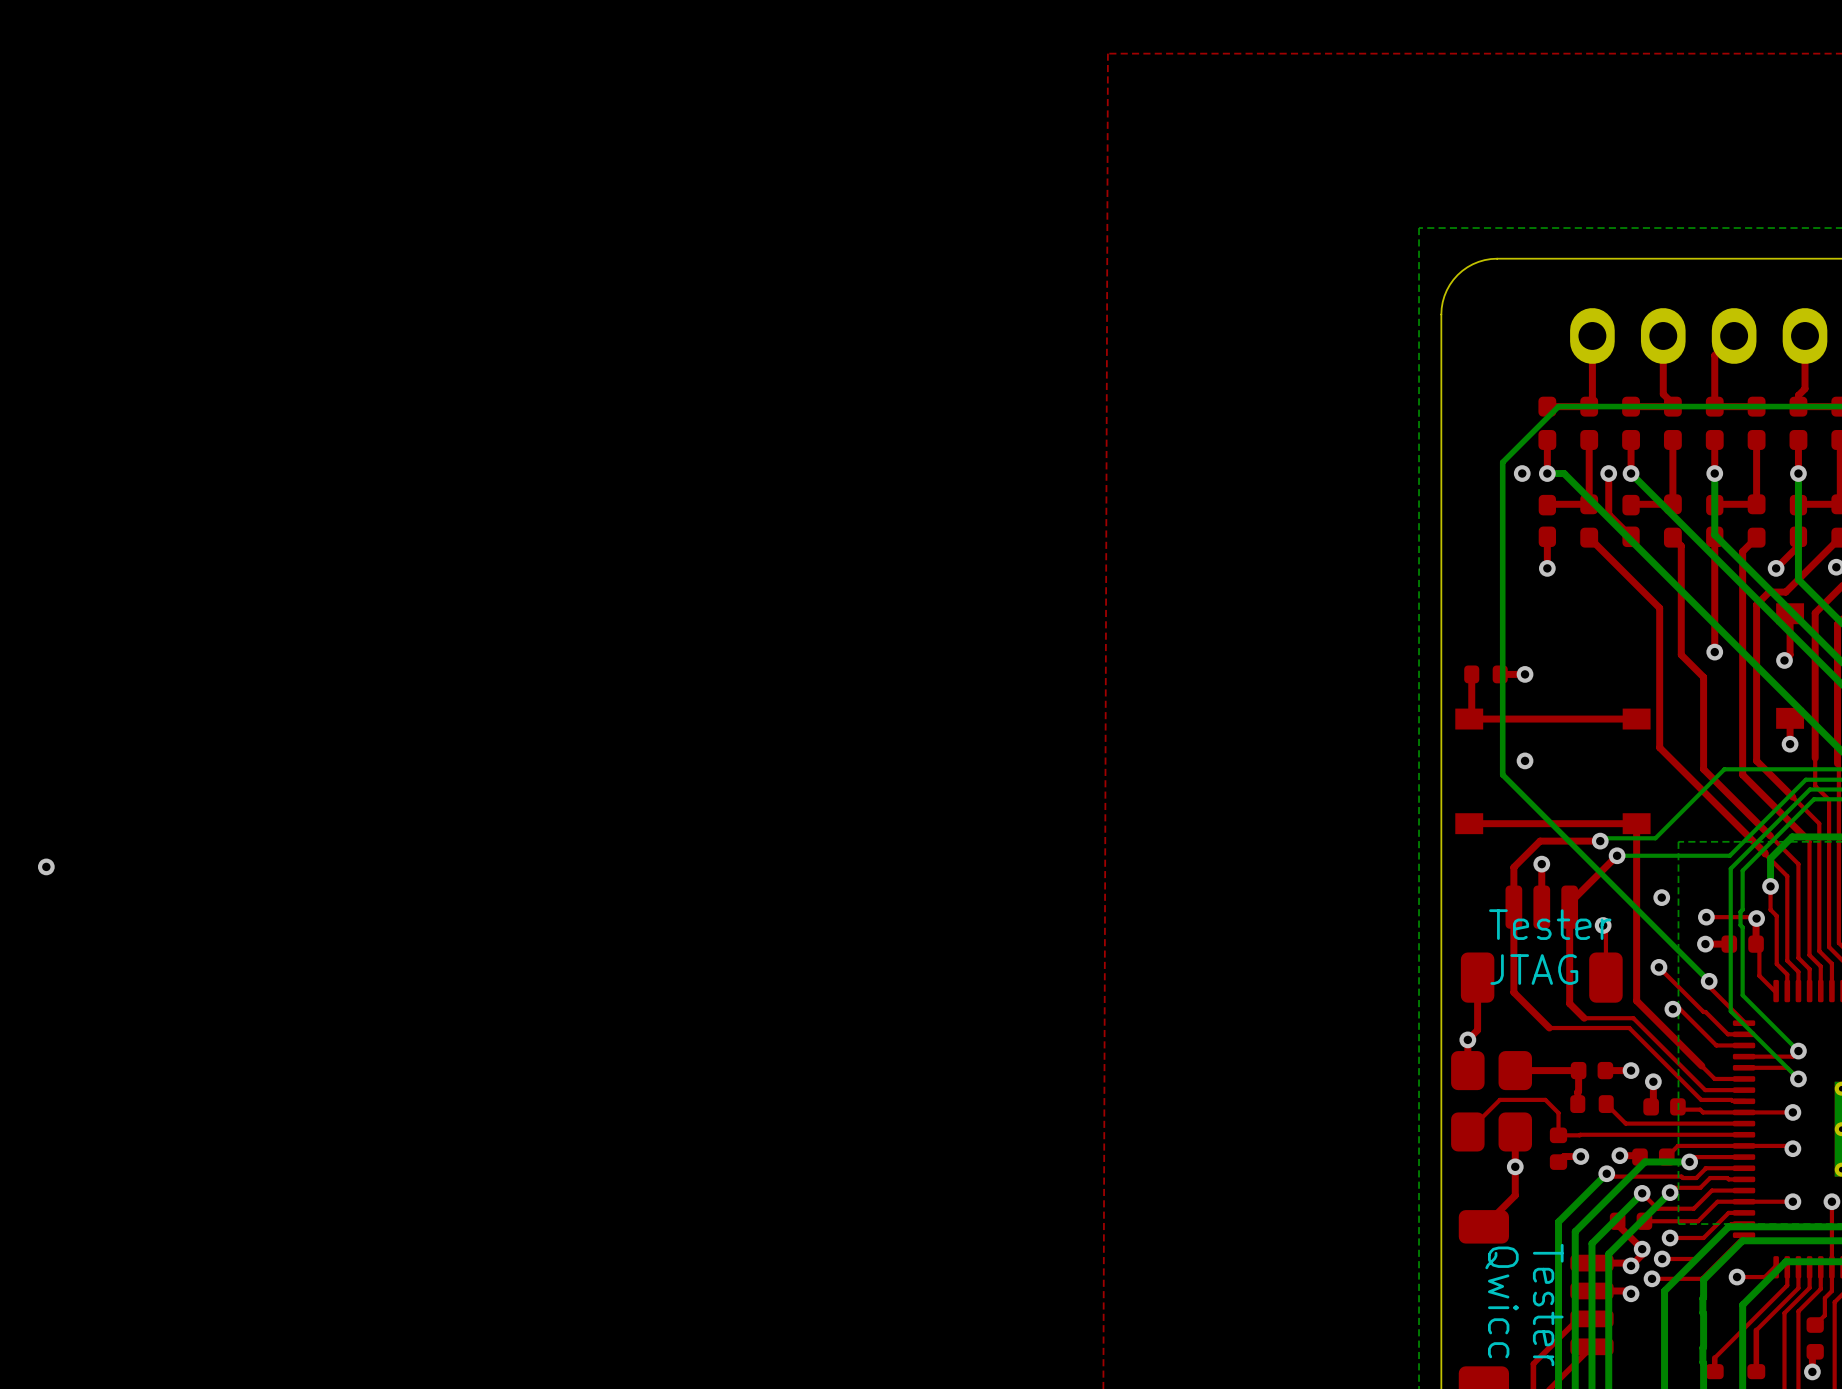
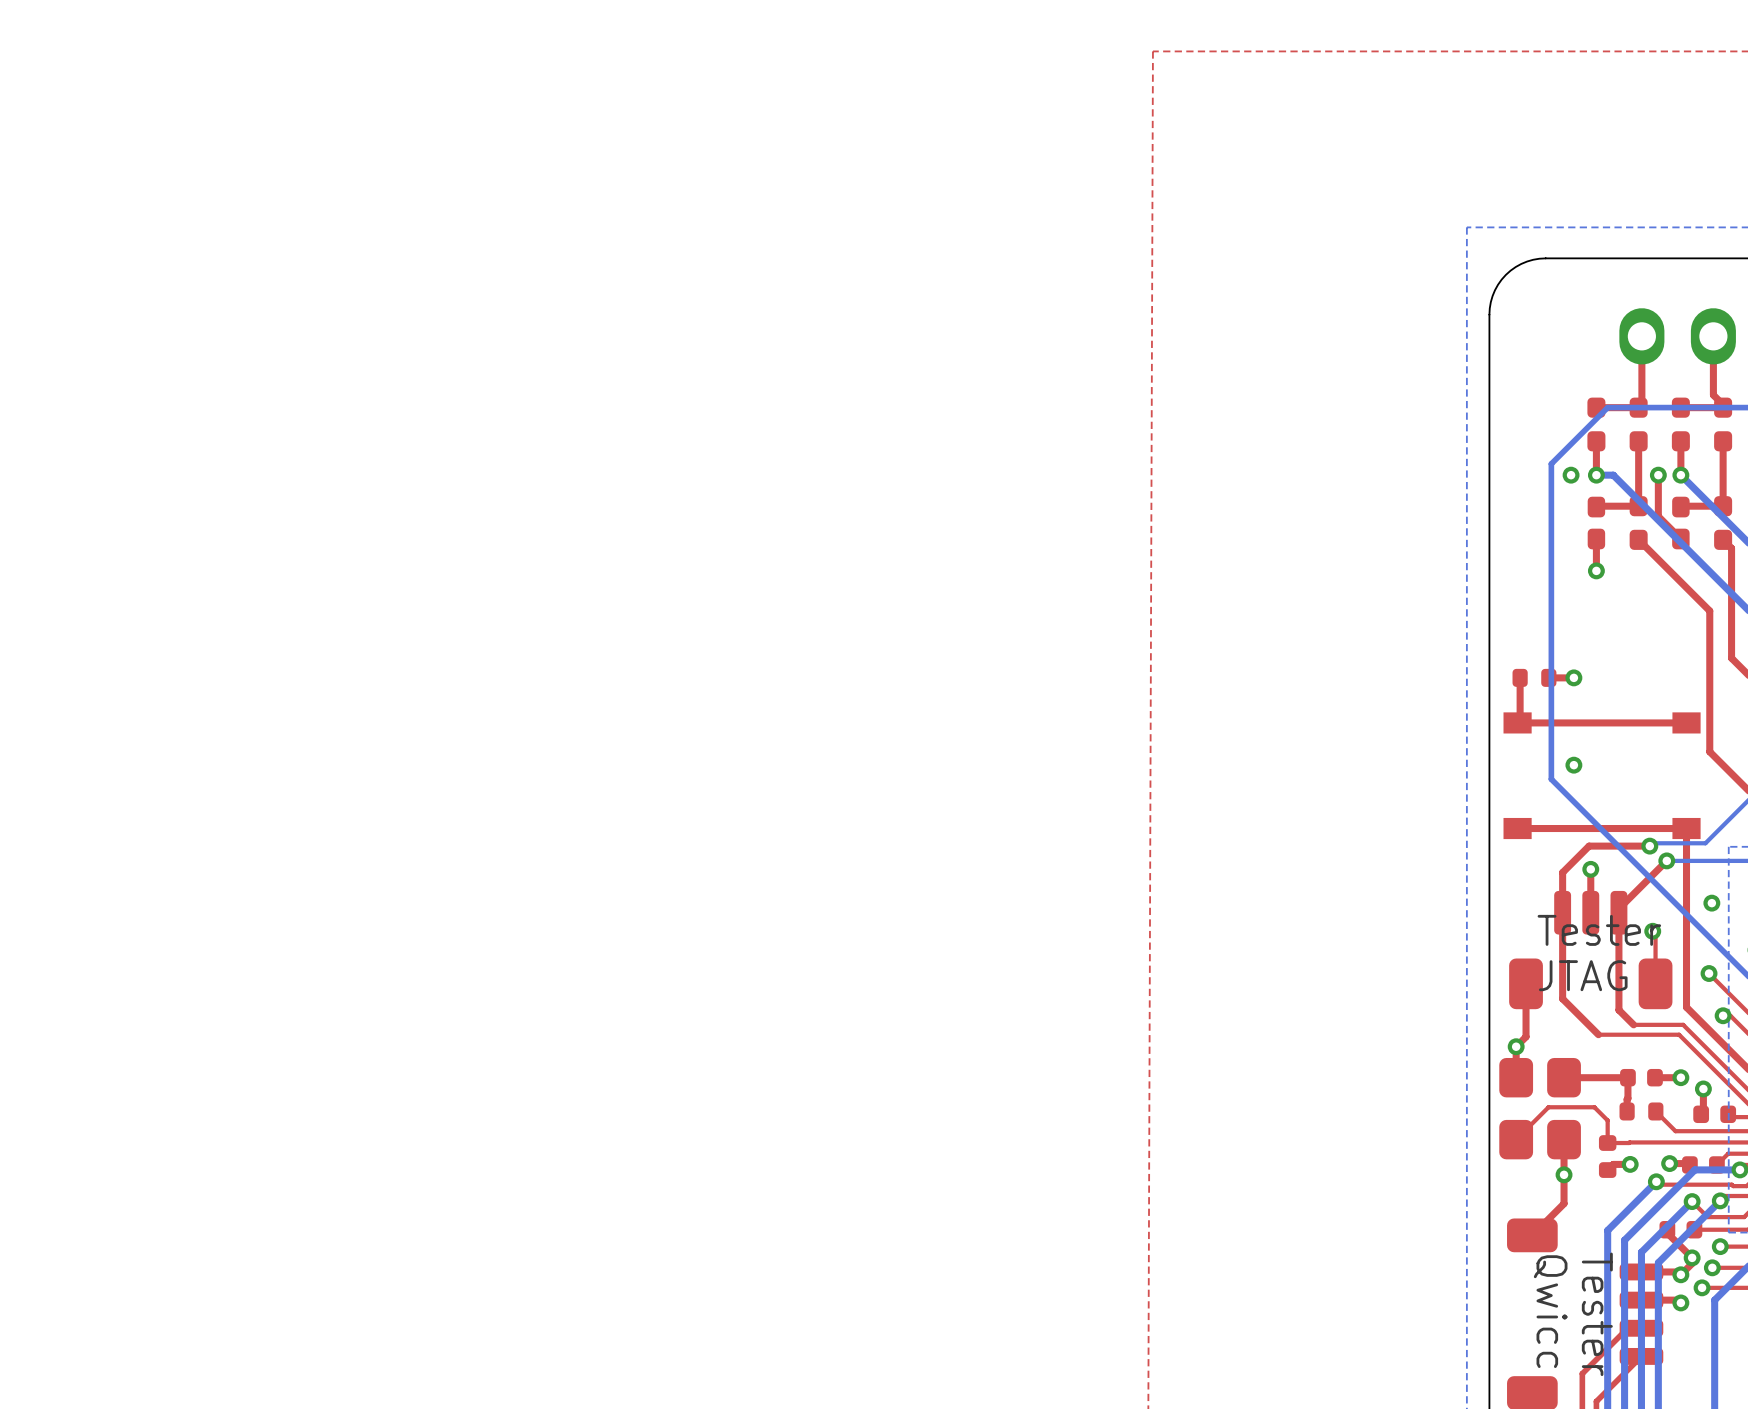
via: (46, 866) -> none

